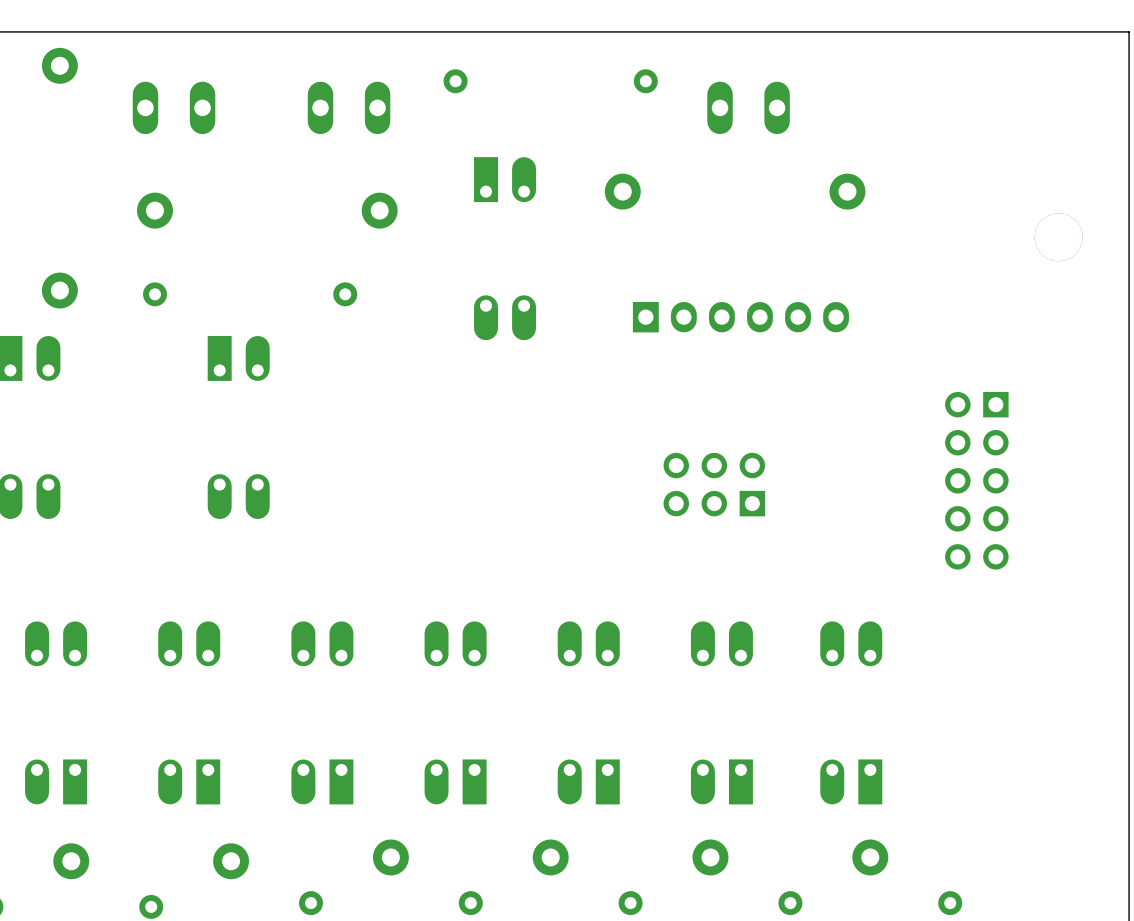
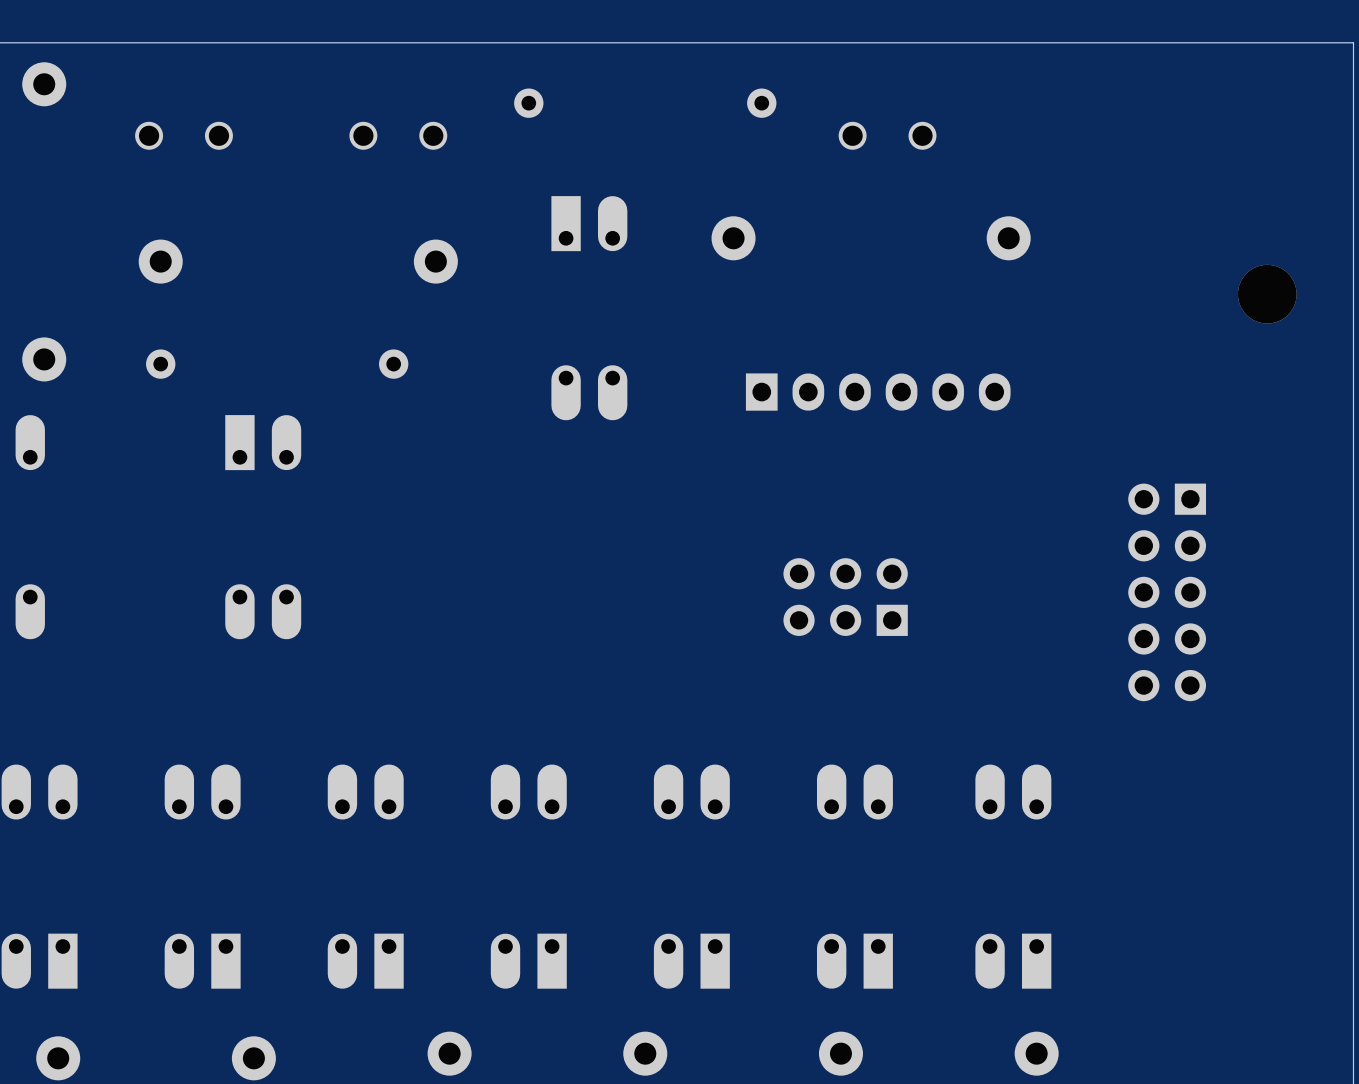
part footprint: [132, 81, 216, 135] -> [135, 121, 233, 150]
part footprint: [307, 81, 391, 135] -> [349, 121, 448, 150]
part footprint: [707, 81, 790, 135] -> [838, 121, 937, 150]

